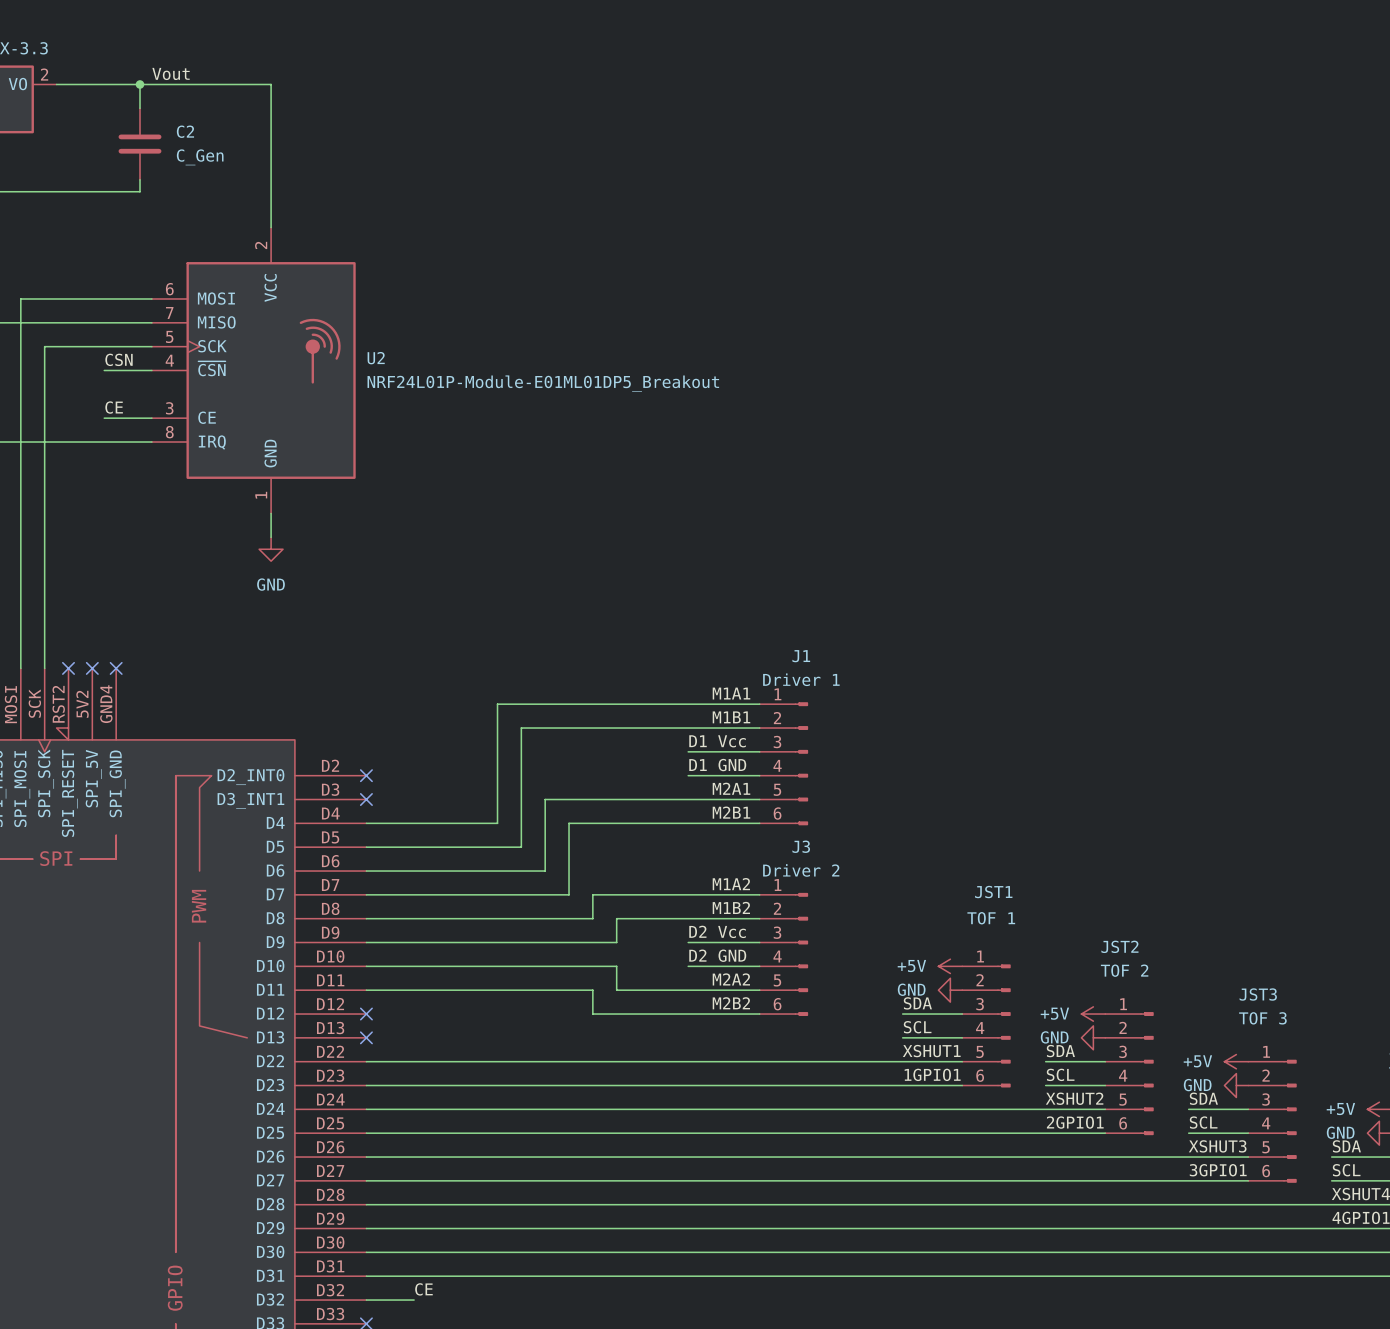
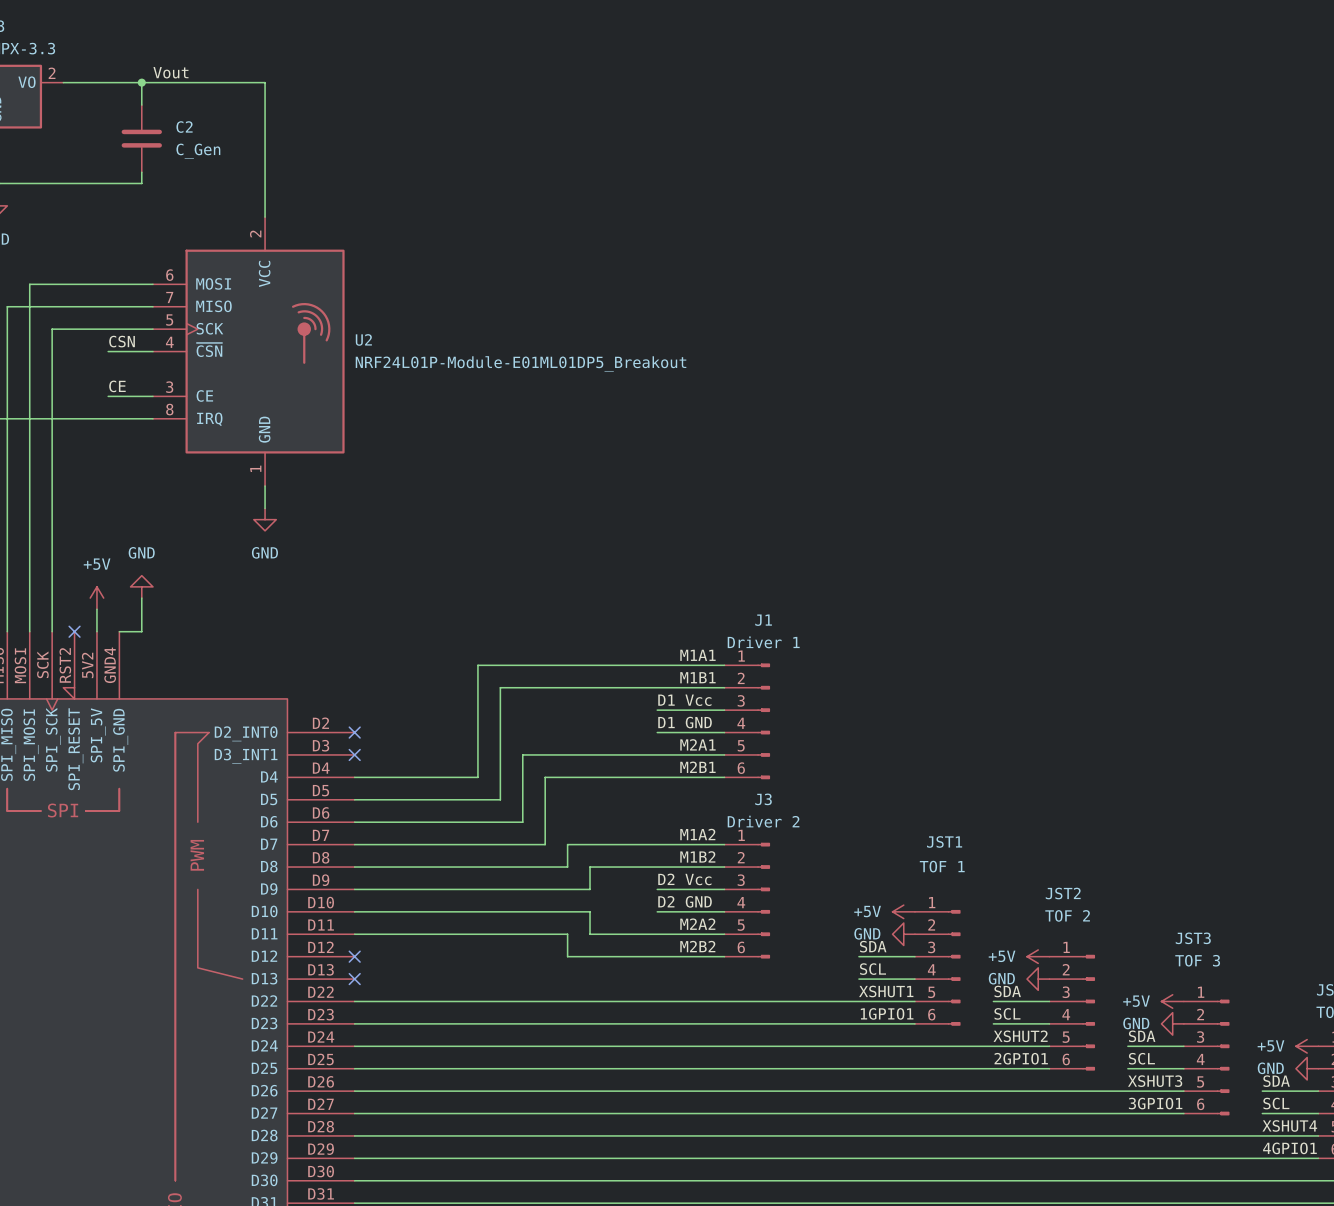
power symbol: none -> GND (141, 586)
power symbol: none -> +5V (96, 598)
wire: none -> (141, 598) (141, 631) (119, 631)
wire: none -> (96, 609) (96, 631)
no-connect mark: (92, 668) -> none
no-connect mark: (116, 668) -> none

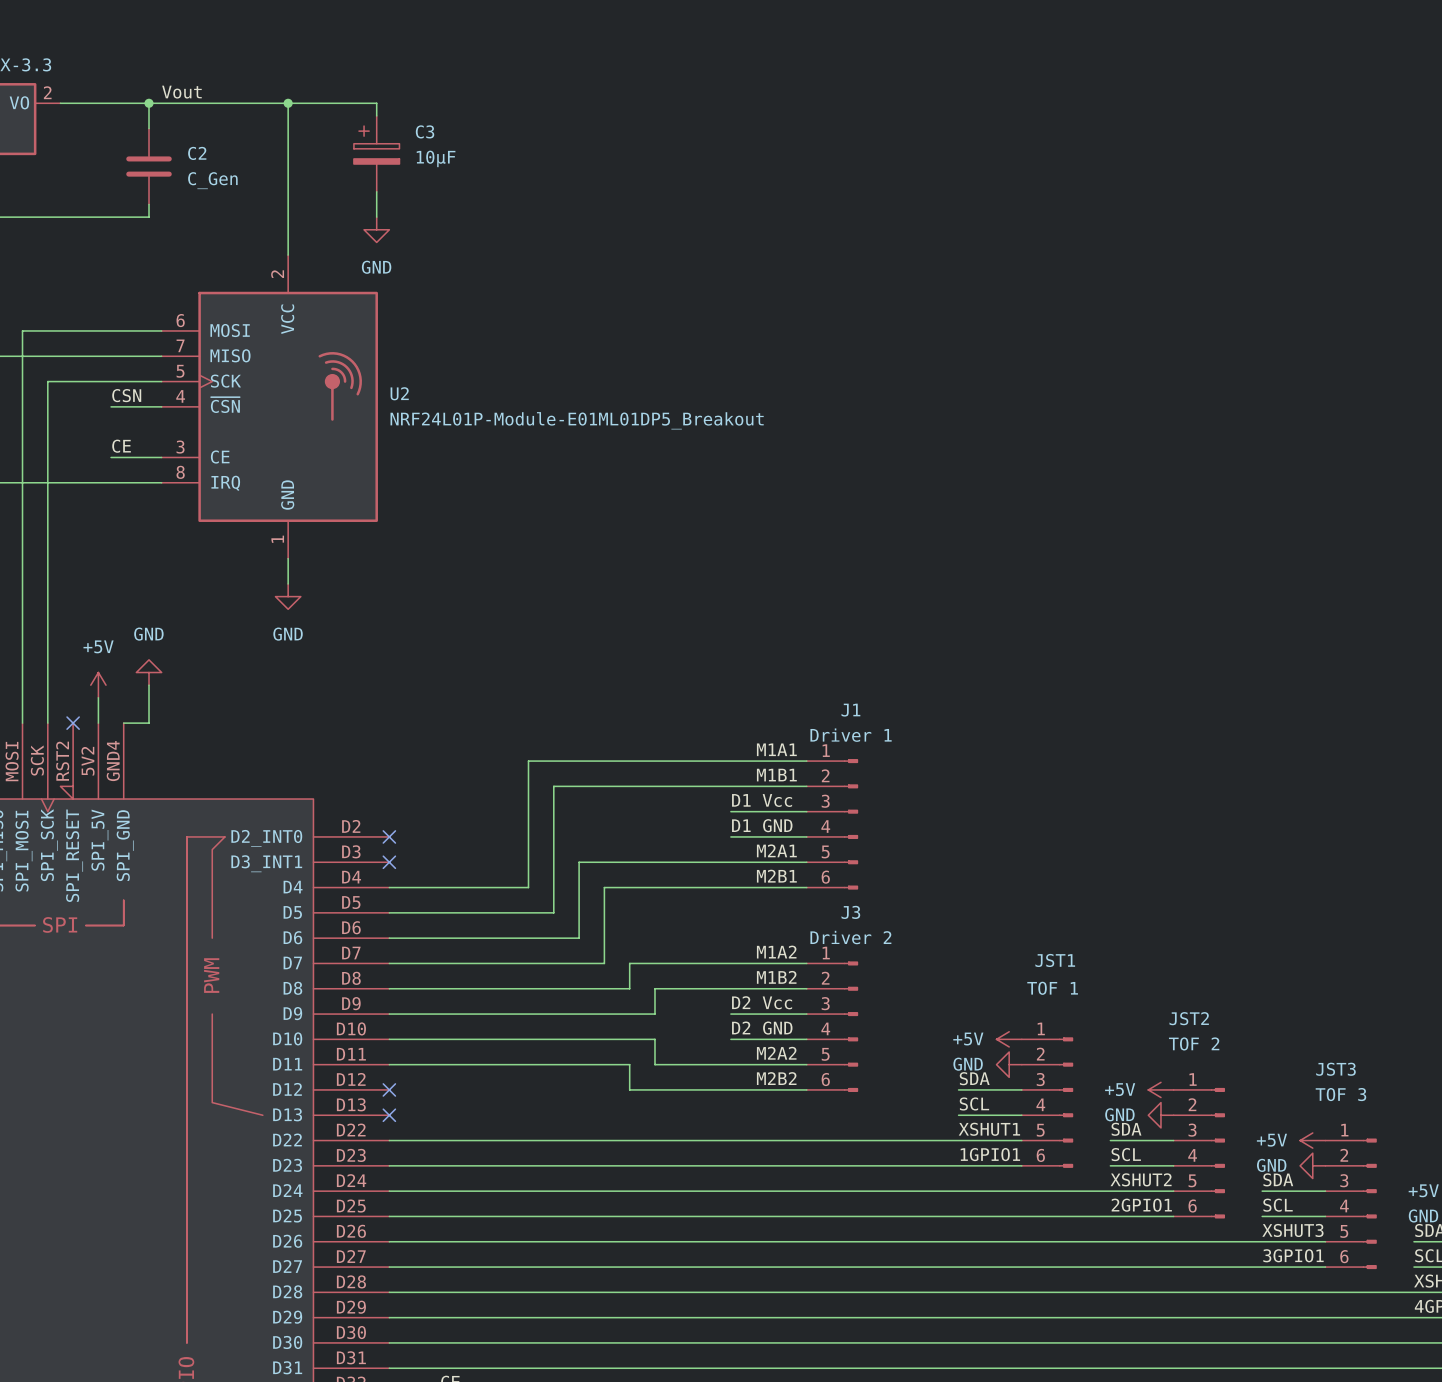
wire: none -> (288, 103) (376, 103) (376, 115)
junction: none -> (288, 103)
C3: none -> 10µF (376, 153)
wire: none -> (376, 191) (376, 217)
power symbol: none -> GND (376, 229)

